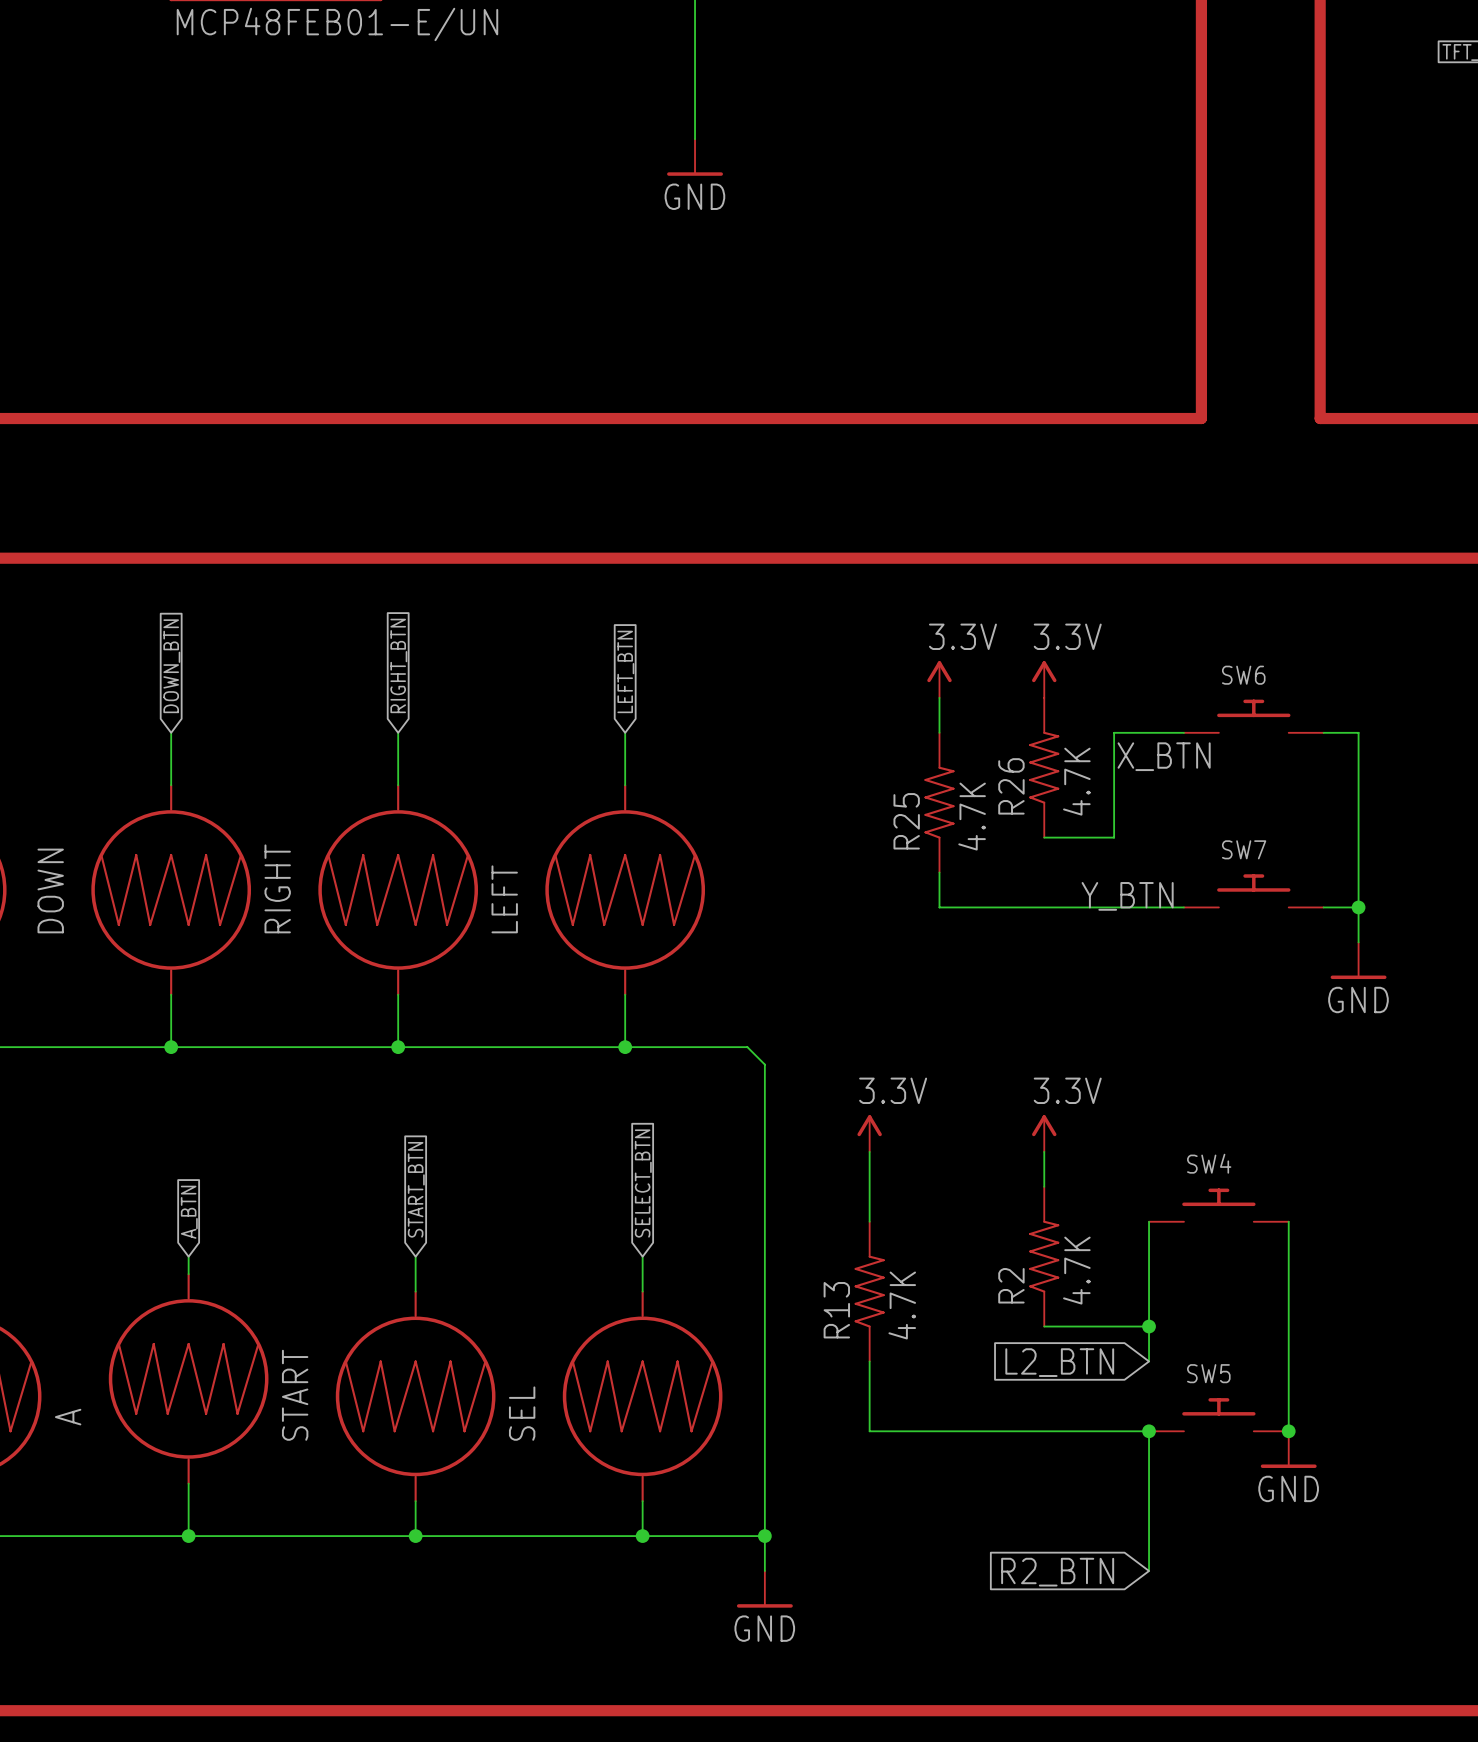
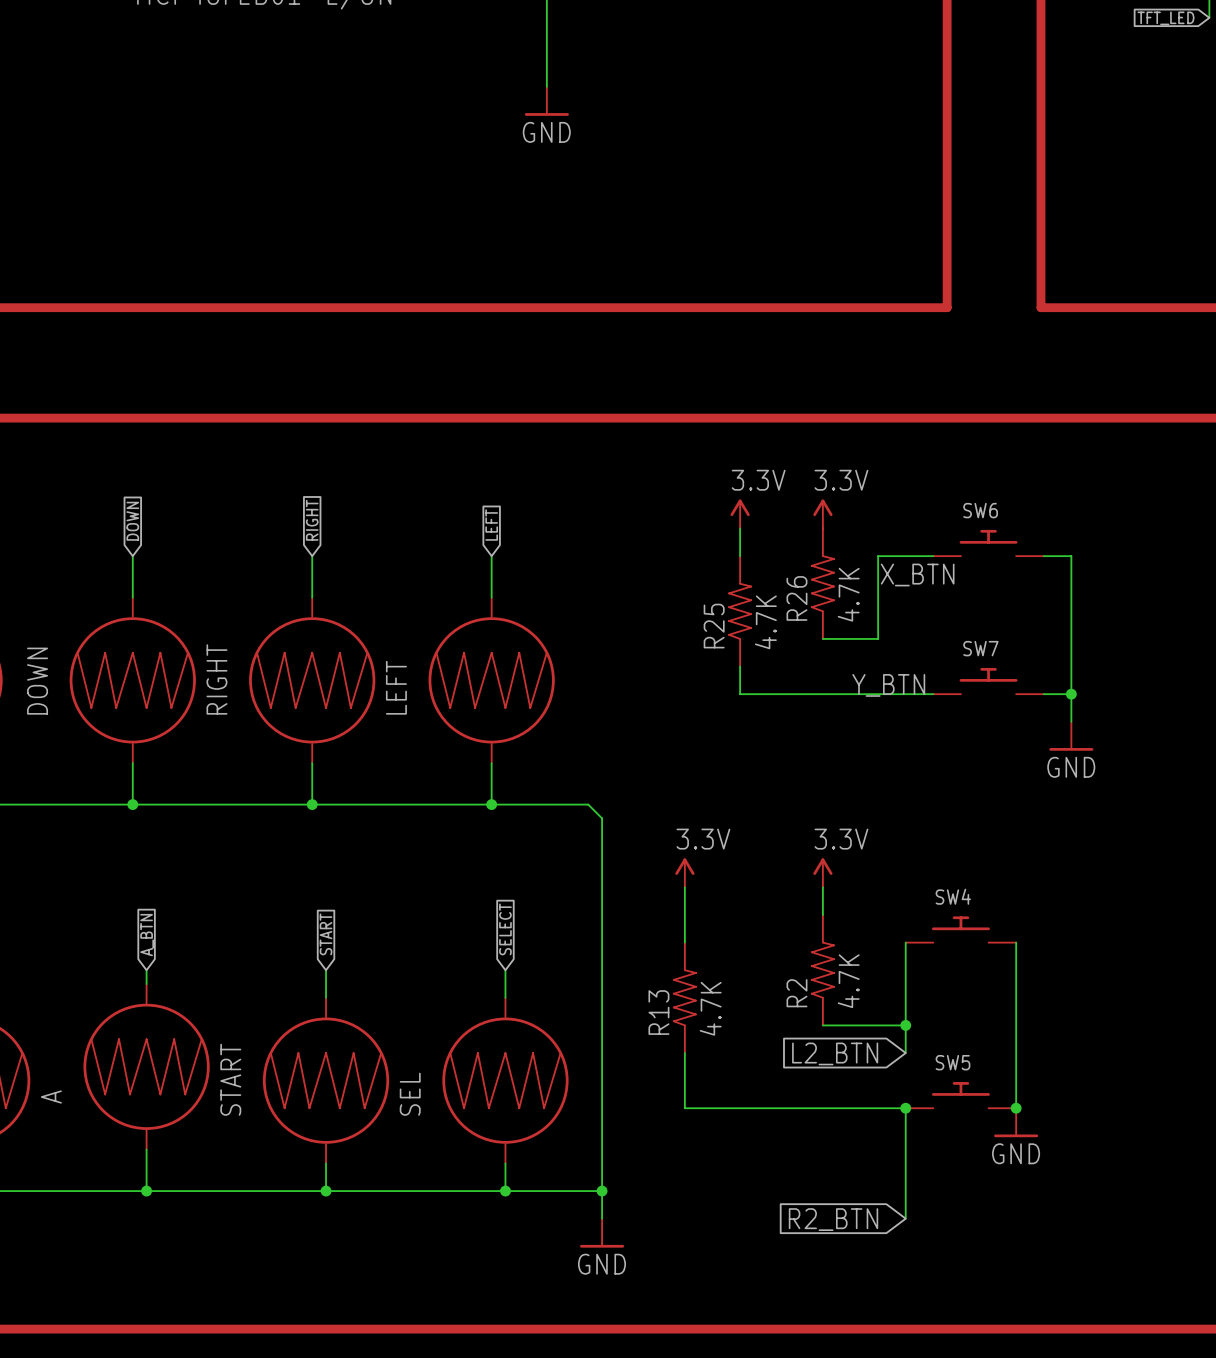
global label: RIGHT_BTN (398, 665) -> RIGHT (312, 520)
global label: DOWN_BTN (171, 666) -> DOWN (132, 521)
global label: LEFT_BTN (625, 671) -> LEFT (491, 525)
global label: SELECT_BTN (643, 1183) -> SELECT (505, 929)
global label: START_BTN (416, 1189) -> START (326, 934)

